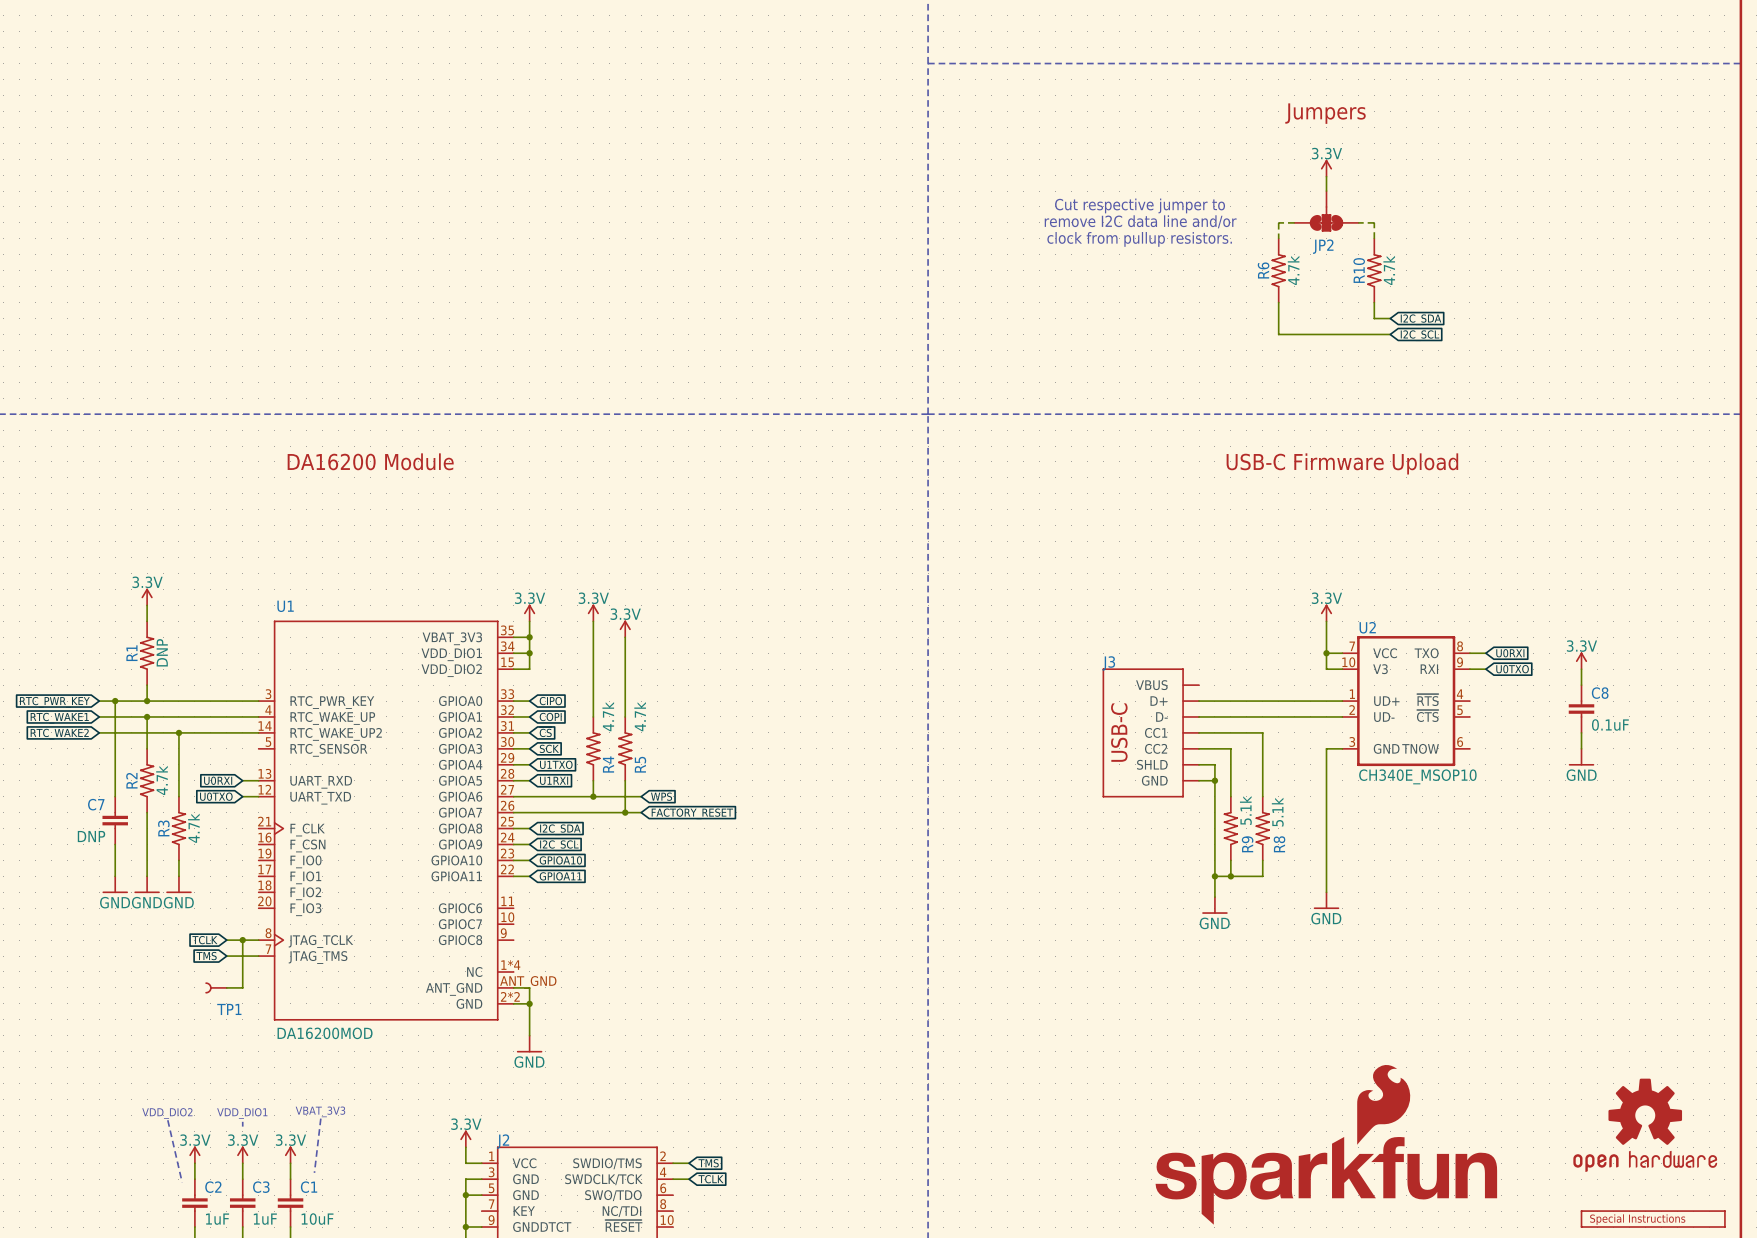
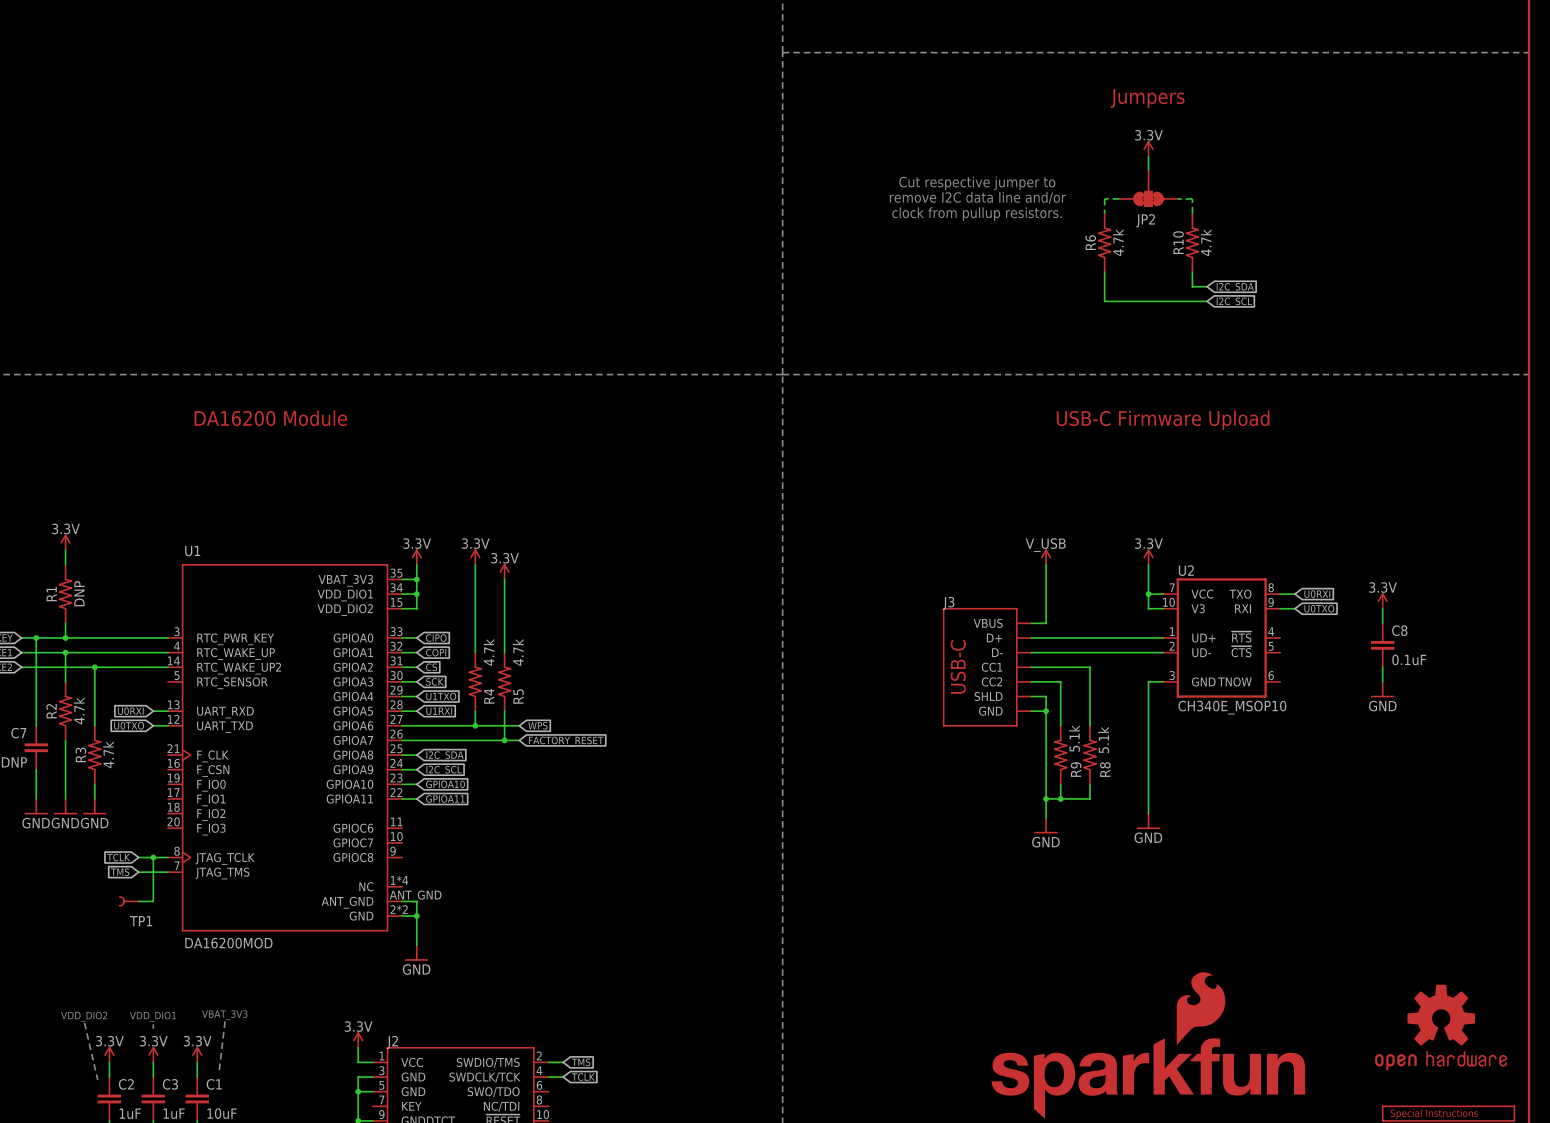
power symbol: none -> V_USB (1046, 557)
wire: none -> (1046, 564) (1046, 623) (1031, 623)

